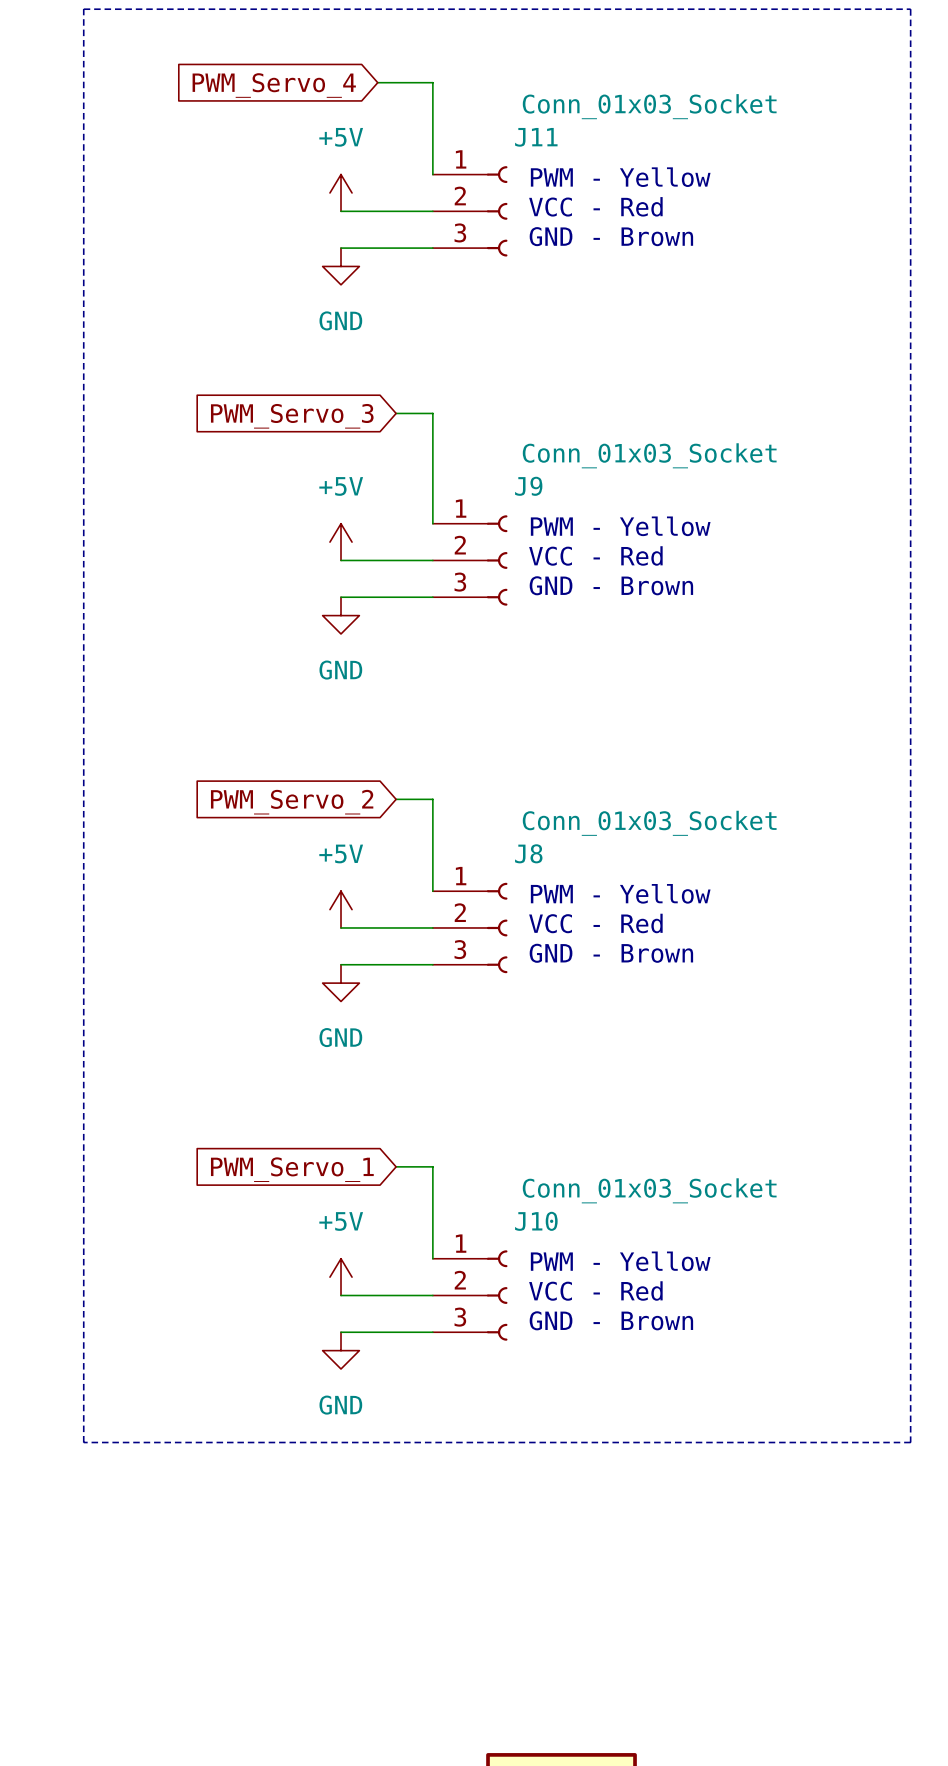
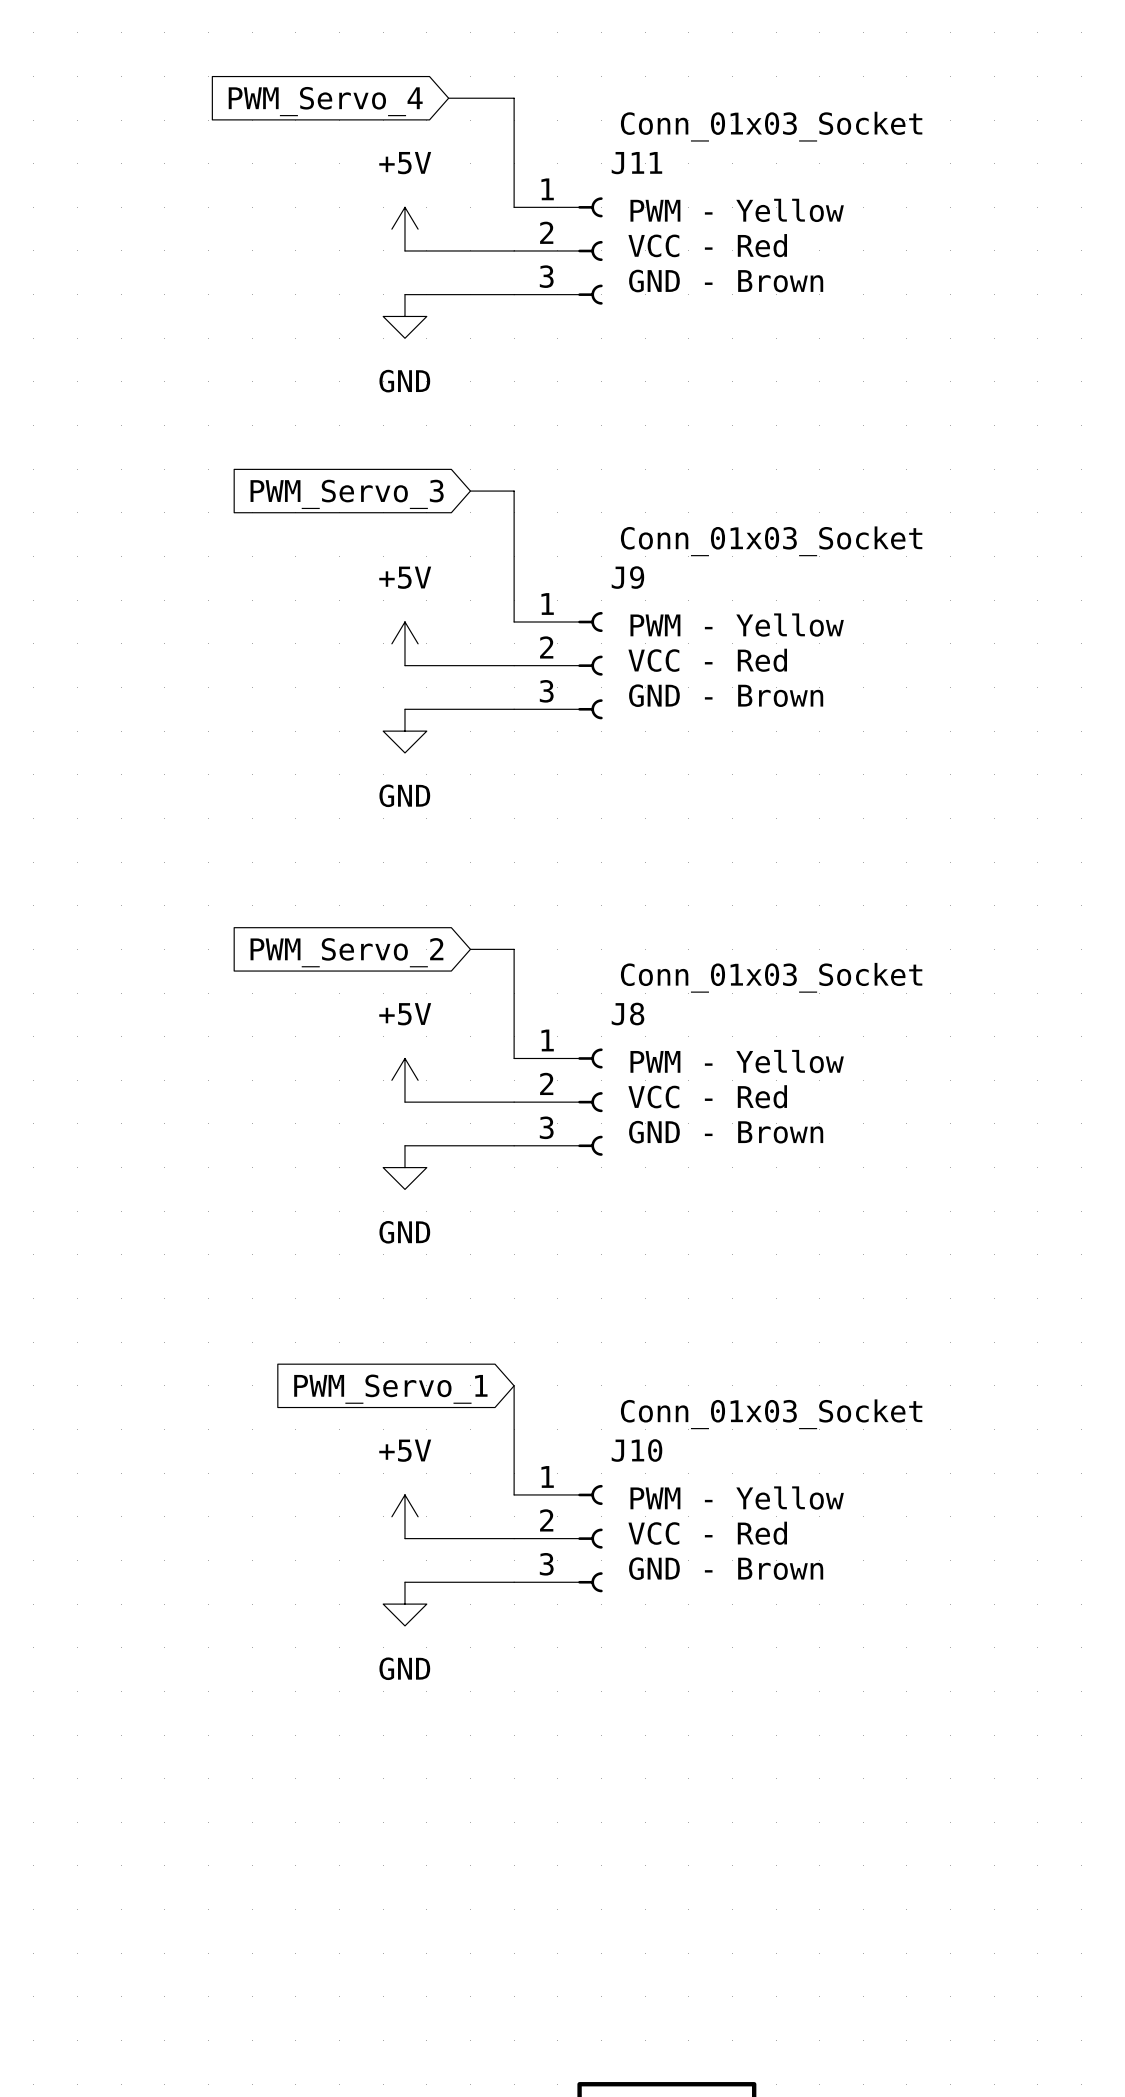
line: (83, 9) (910, 9) (910, 1442) (83, 1442) (83, 9) -> none
wire: (396, 1166) (432, 1166) -> none
global label position: PWM_Servo_1 (292, 1169) -> PWM_Servo_1 (390, 1389)

